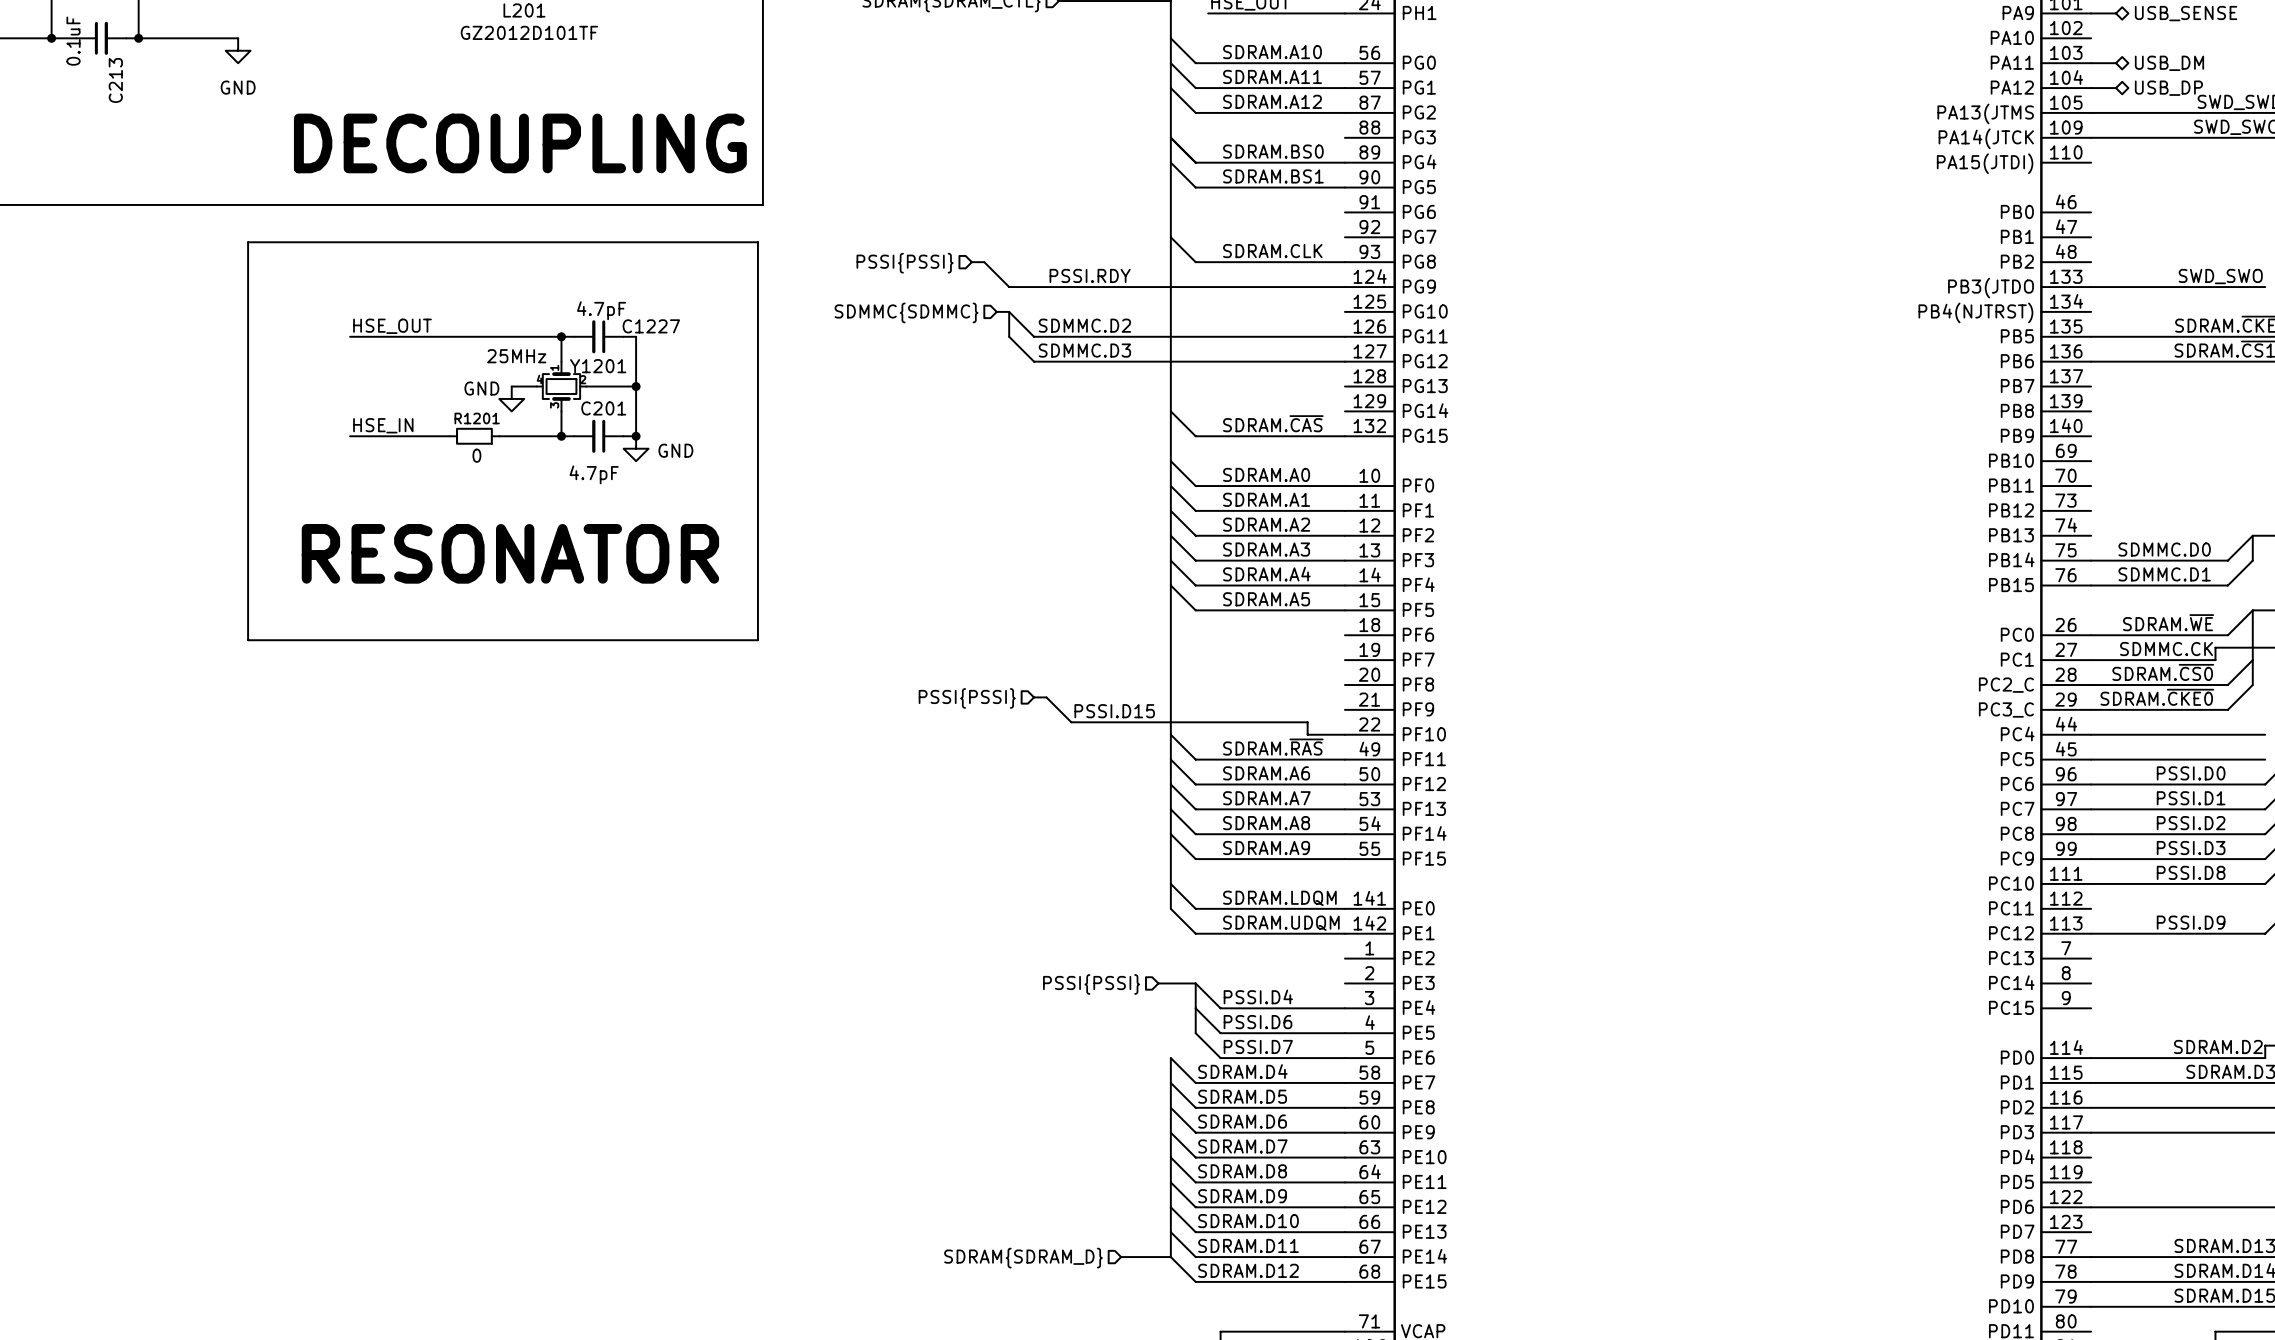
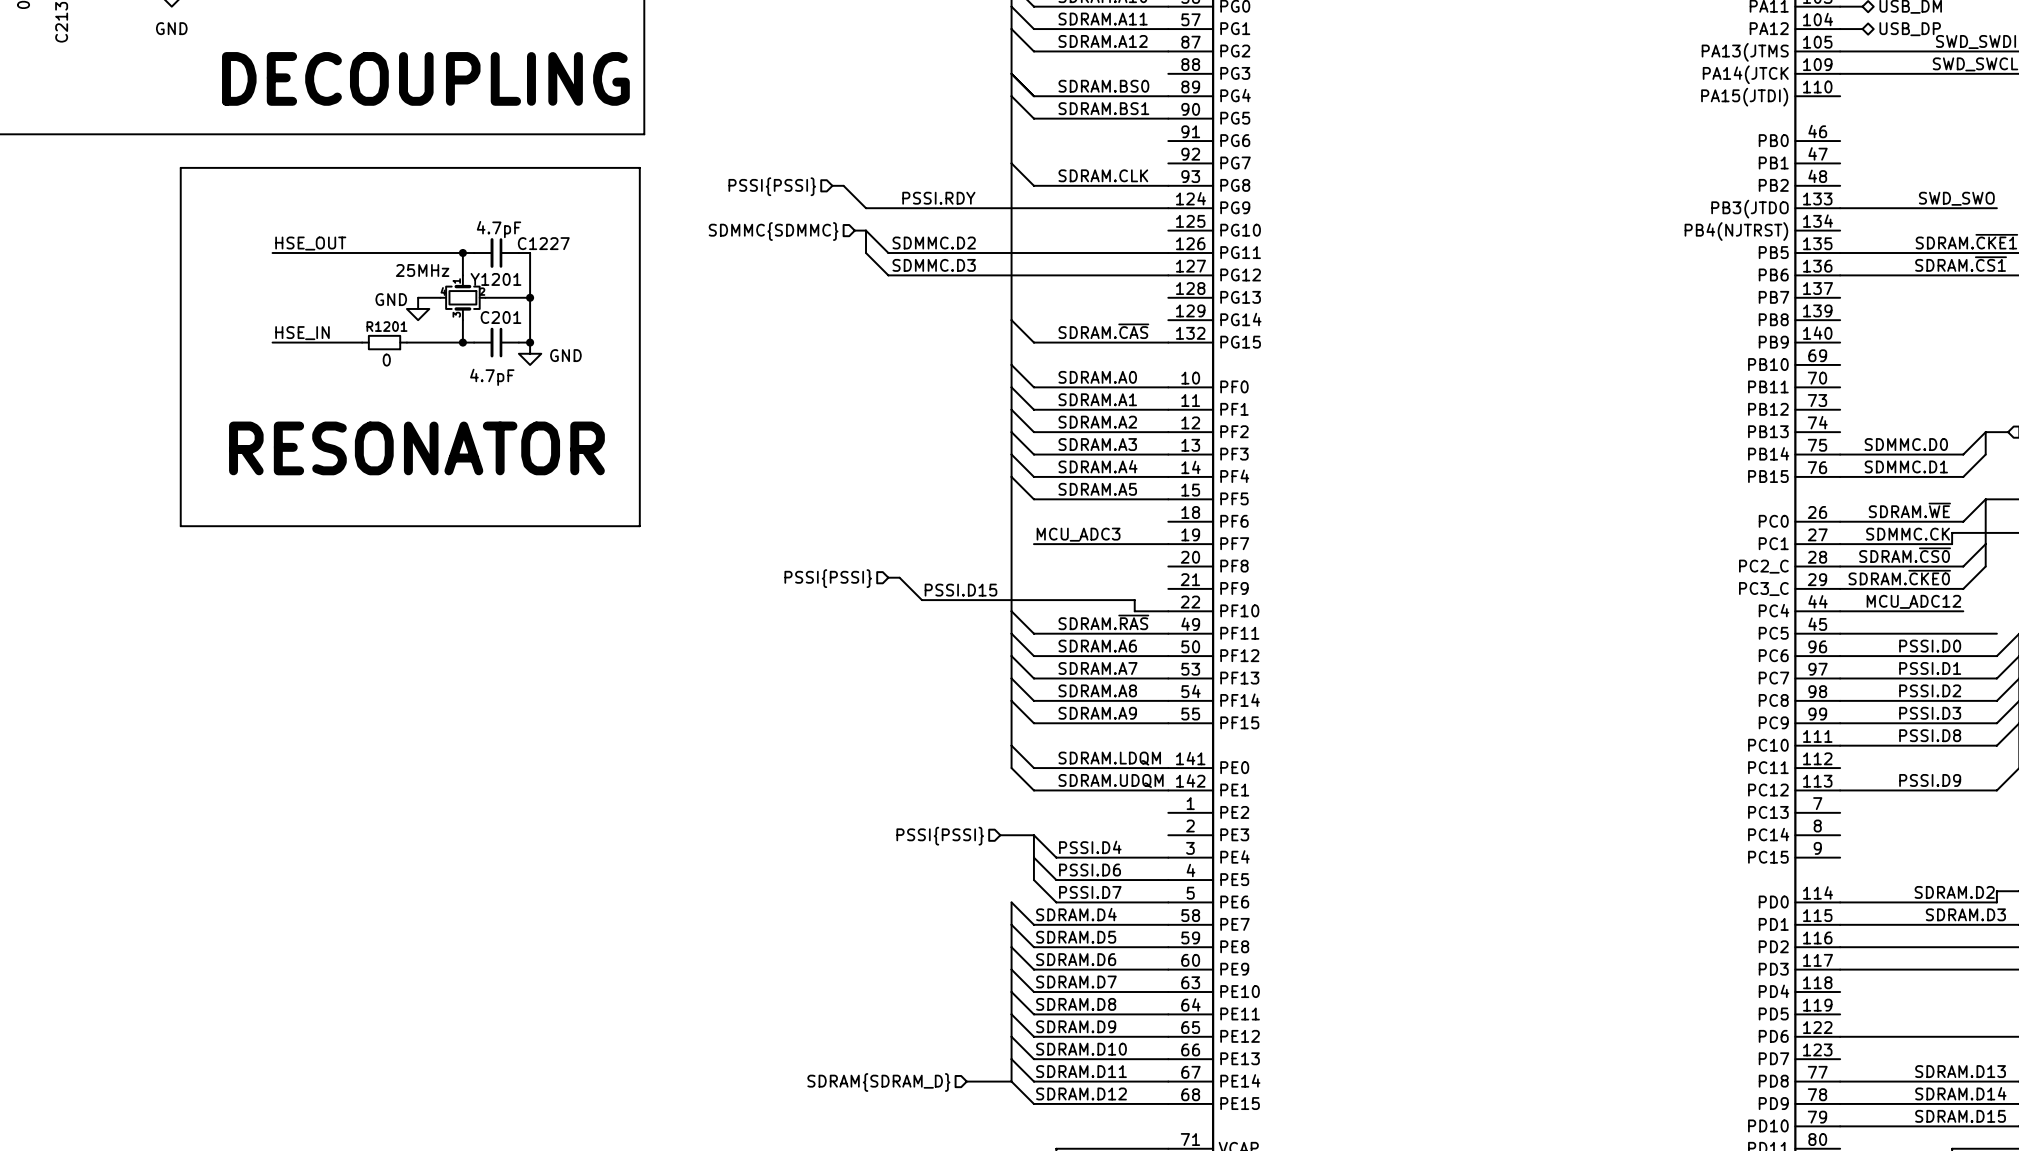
label: none -> MCU_ADC3 (1078, 534)
wire: none -> (1033, 544) (1168, 544)
label: none -> MCU_ADC12 (1913, 601)
wire: (2227, 734) (2265, 734) -> none

